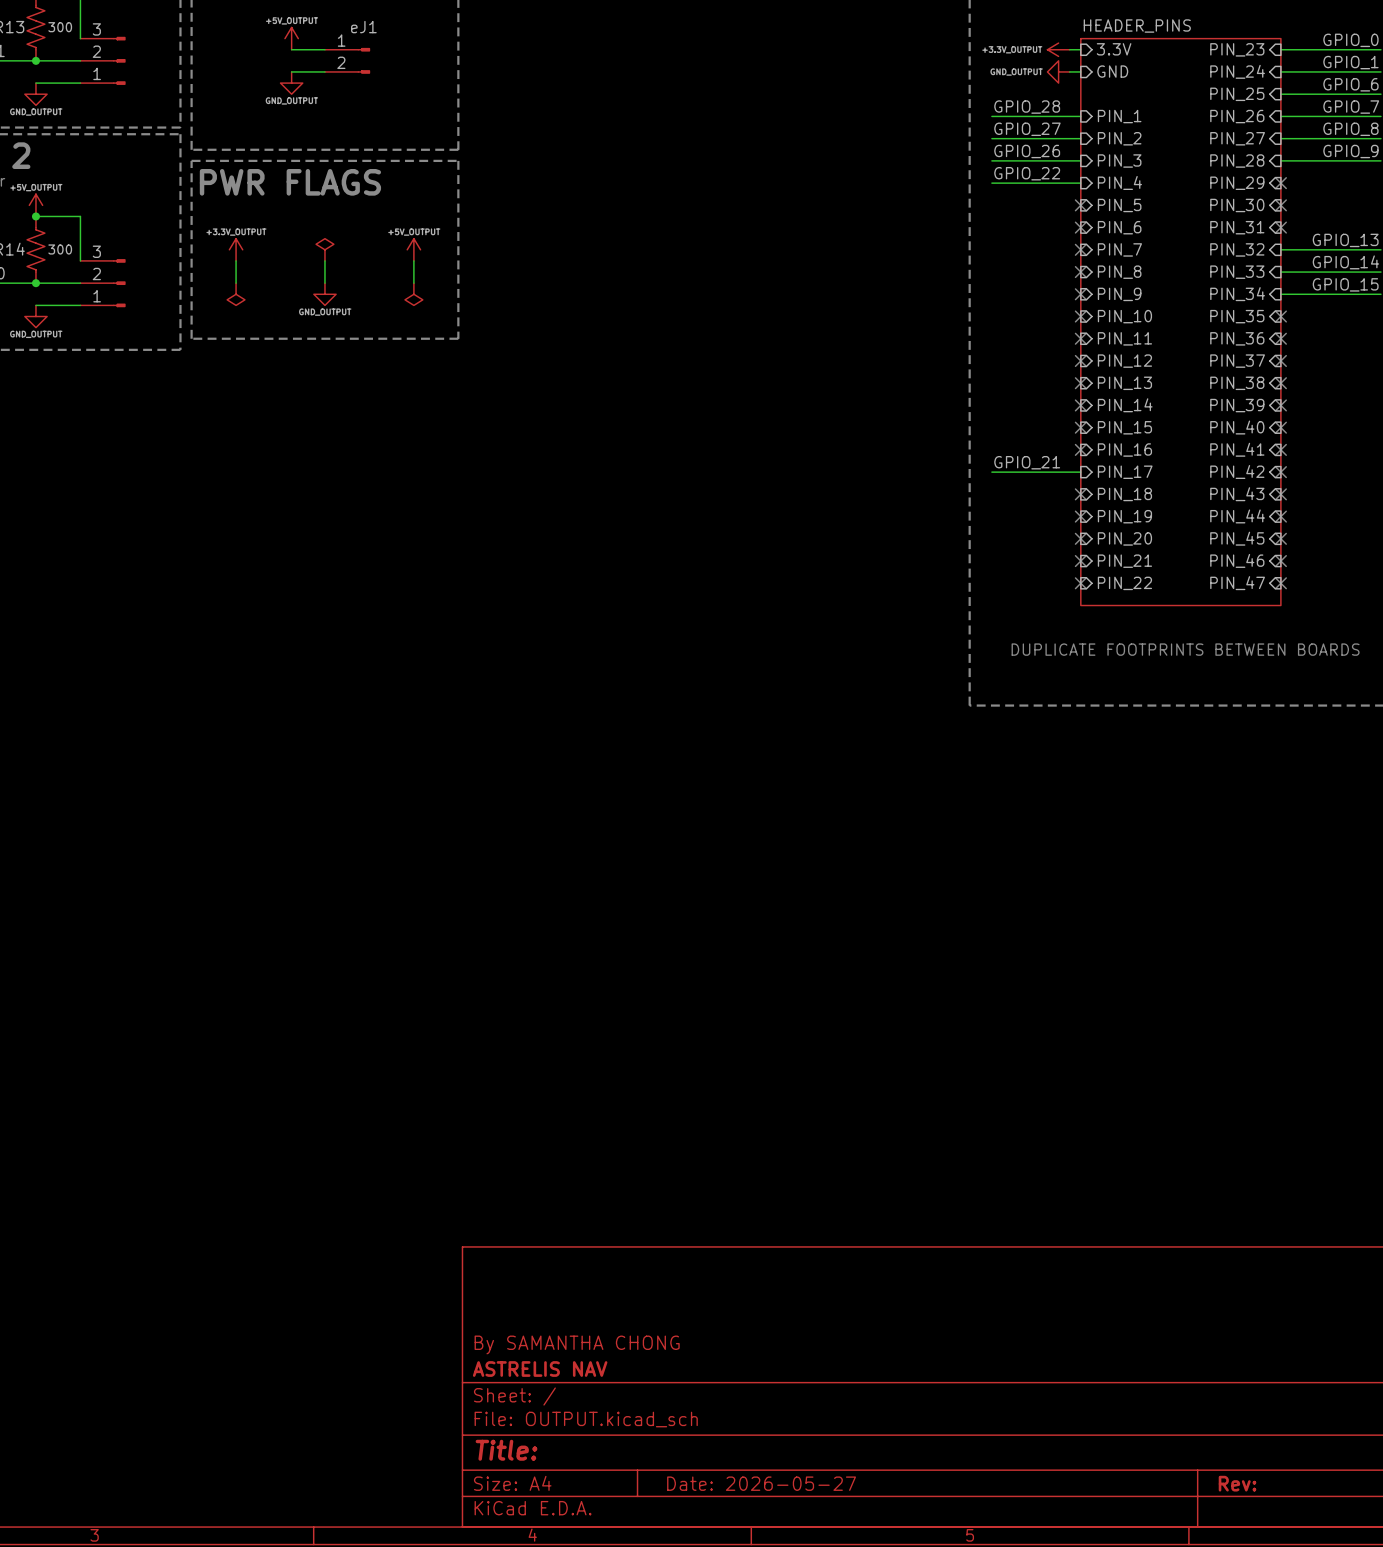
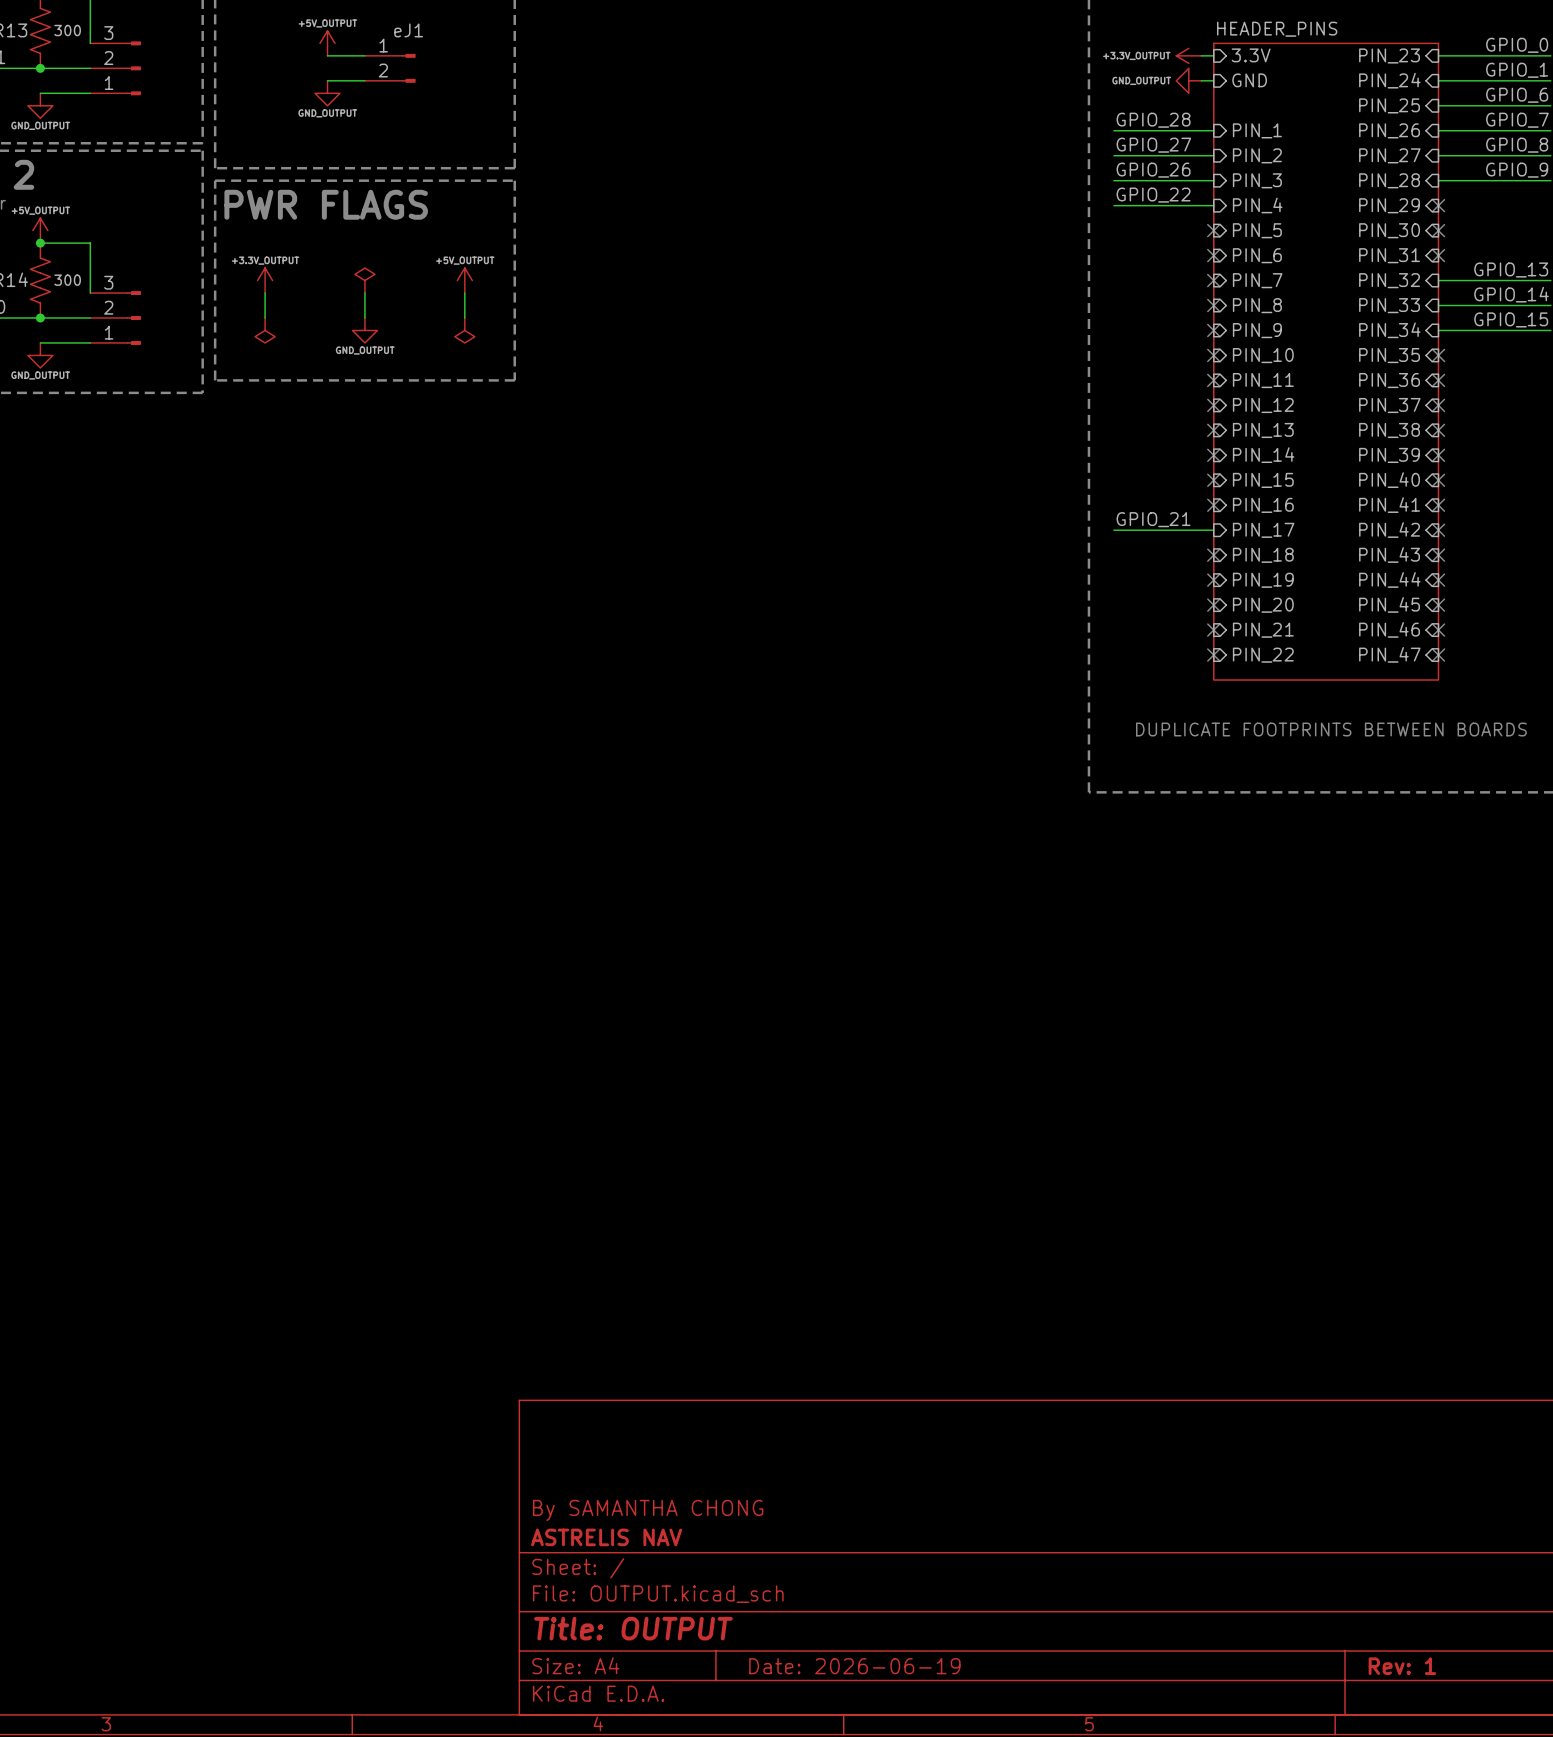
title block: Title: (506, 1450) -> Title: OUTPUT (633, 1628)
title block: Date: 2026-05-27 (761, 1483) -> Date: 2026-06-19 (854, 1666)
title block: Rev: (1237, 1483) -> Rev: 1 (1402, 1666)

